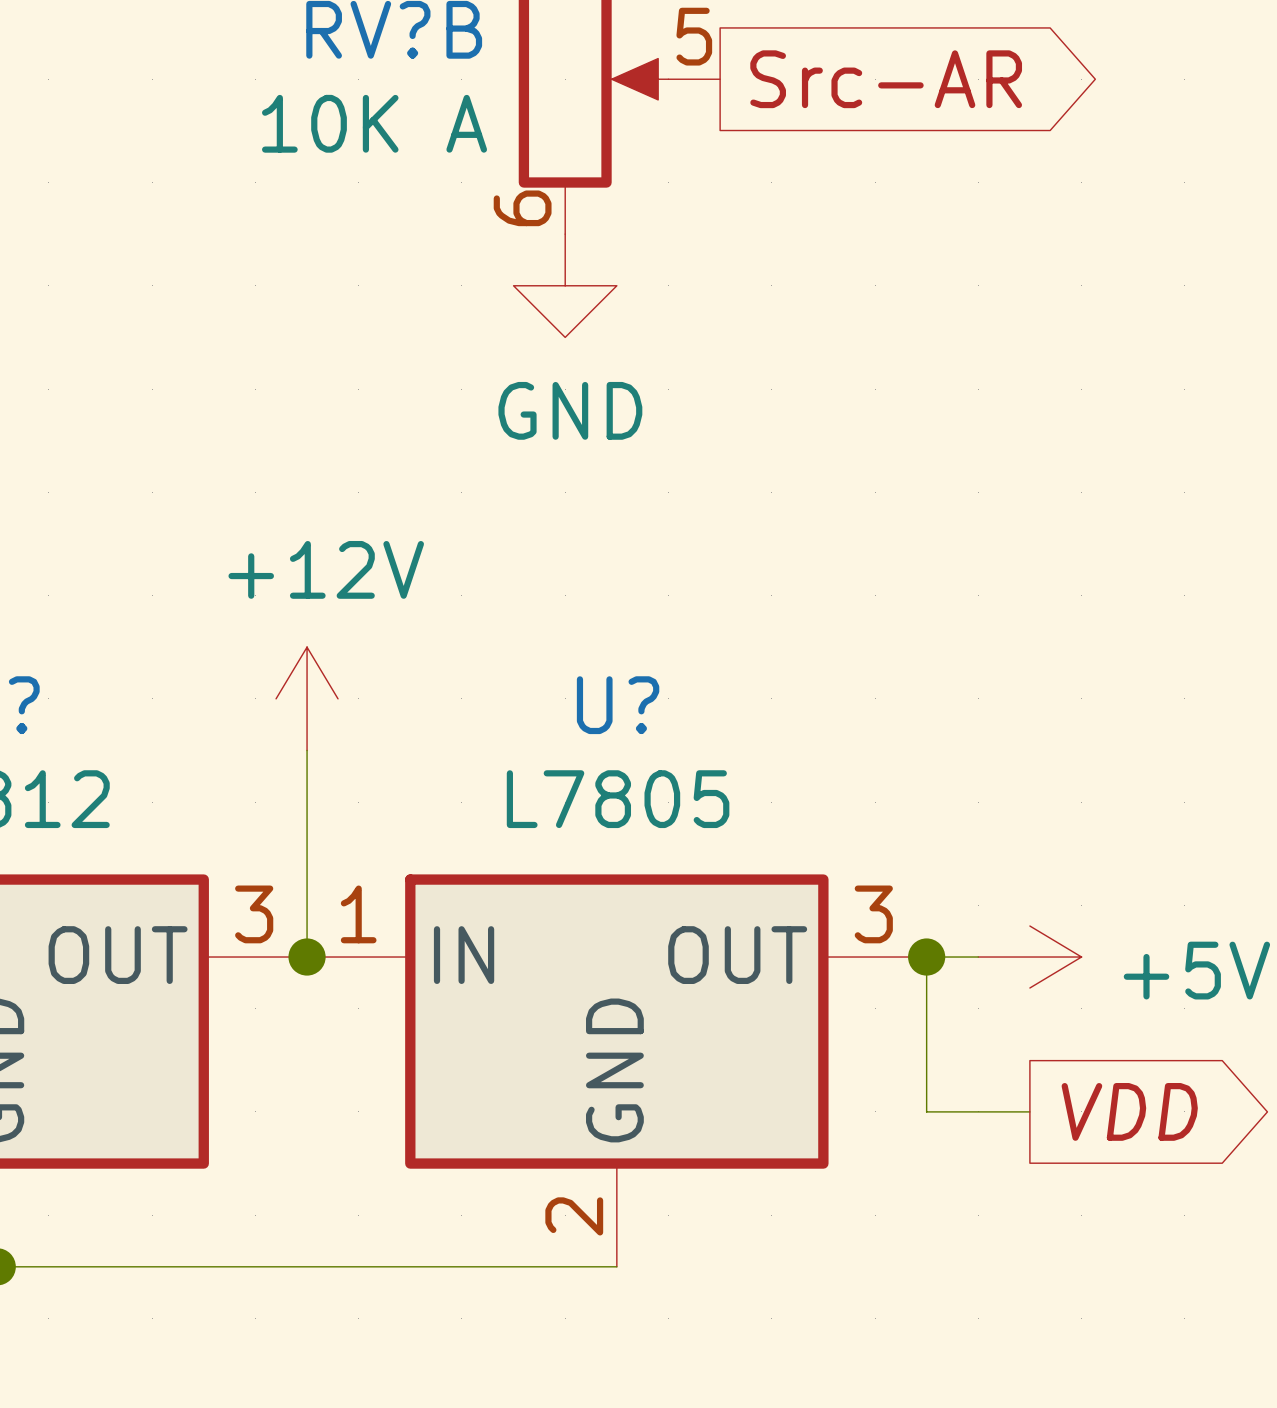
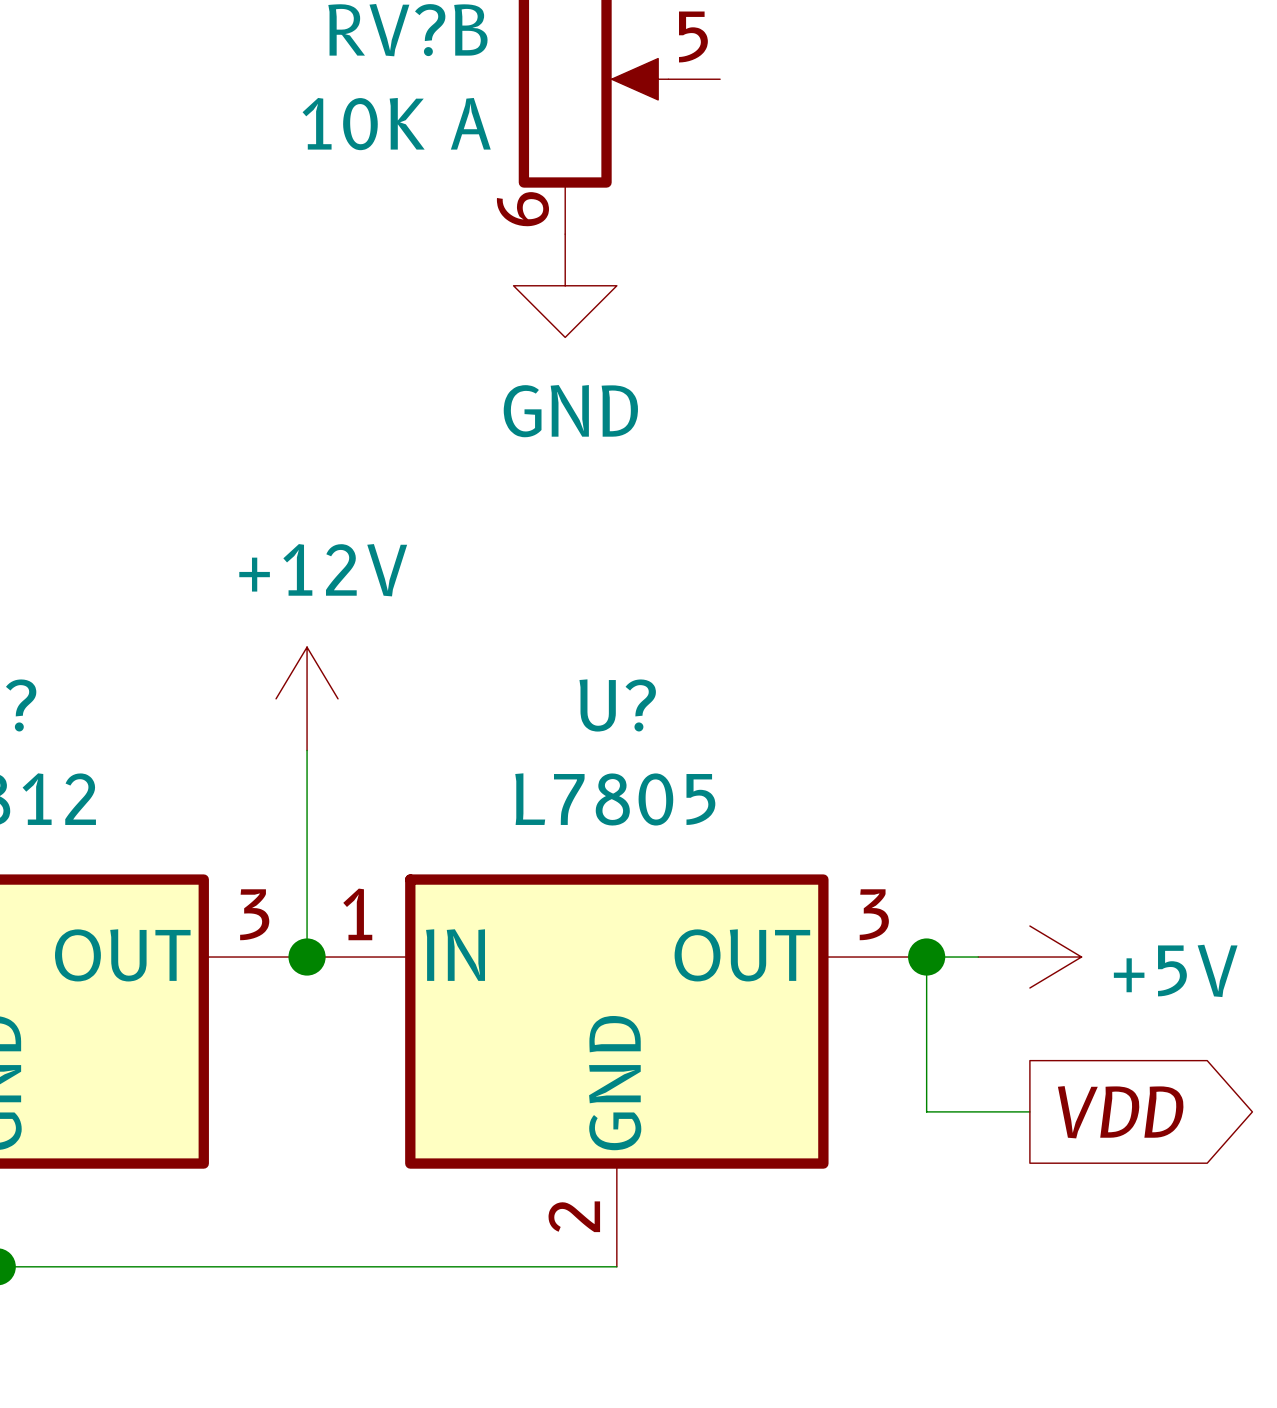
global label: Src-AR (886, 79) -> none

